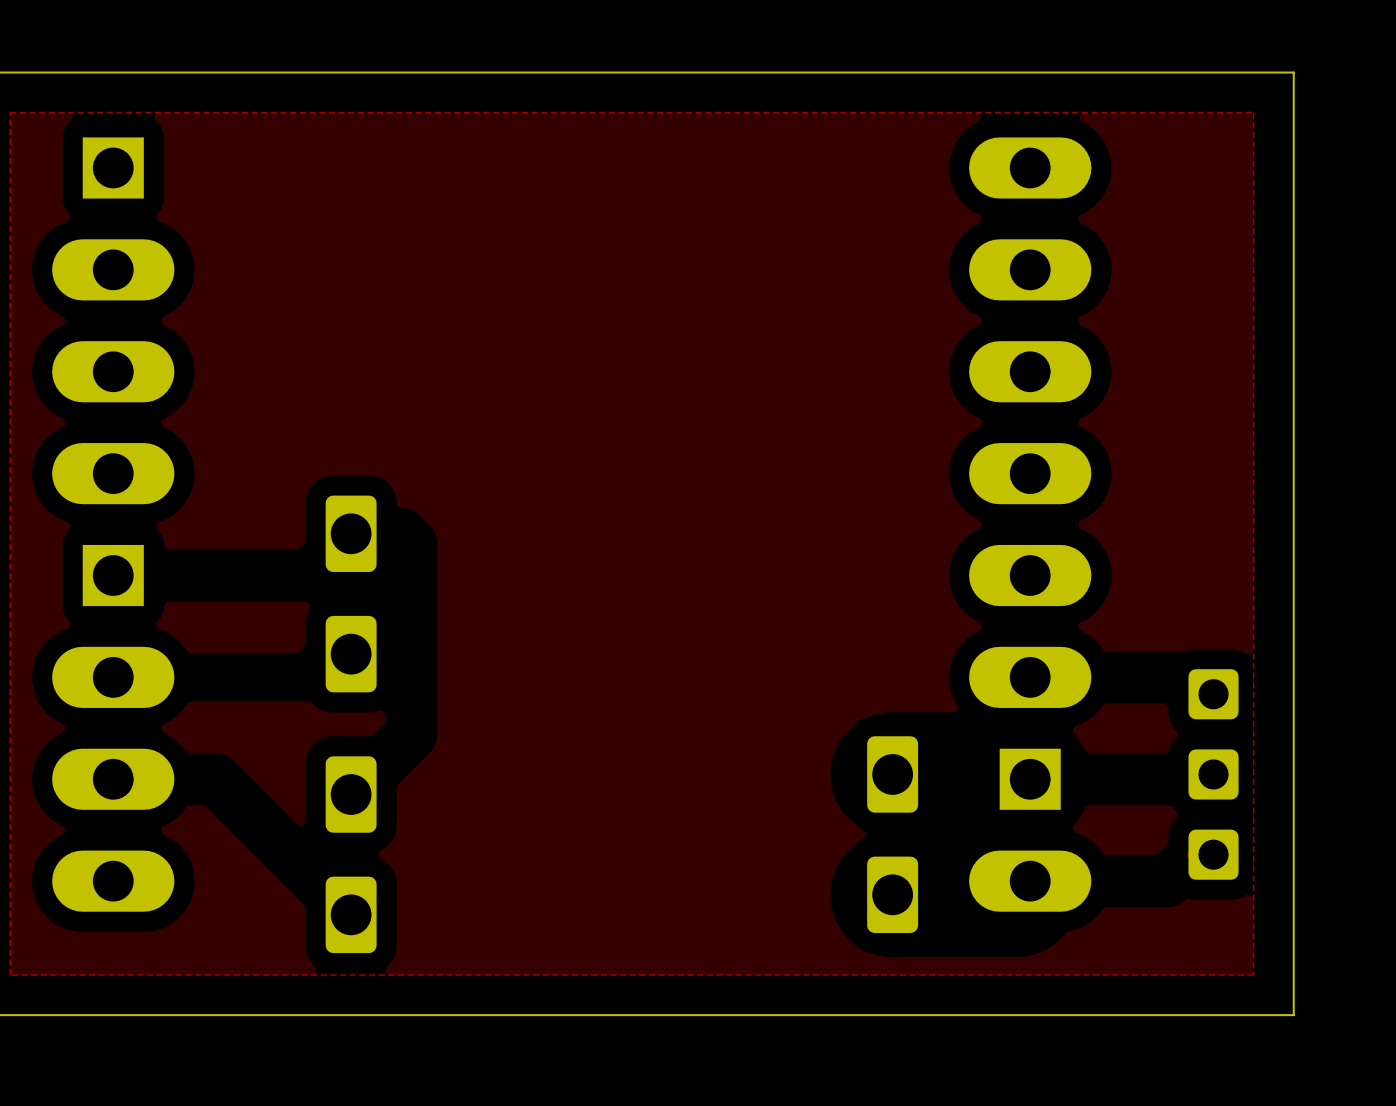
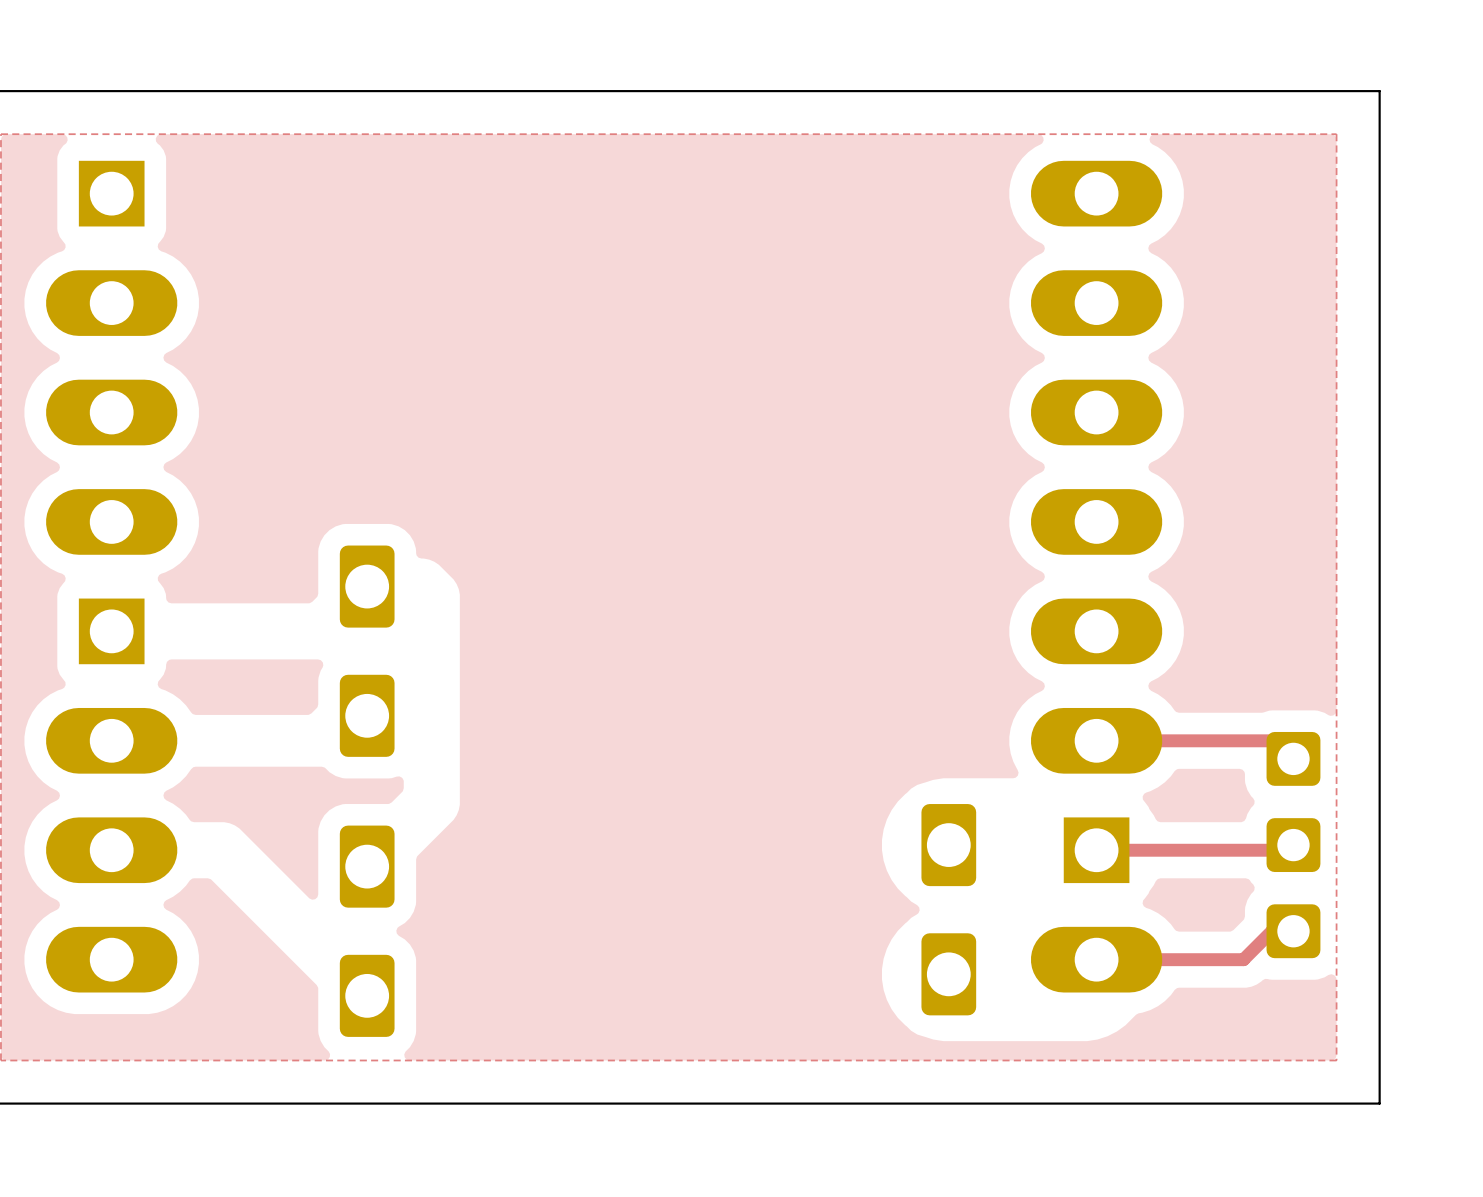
top track: none -> (1096, 740) (1275, 740)
top track: none -> (1096, 850) (1288, 850)
top track: none -> (1271, 931) (1243, 959) (1096, 959)

